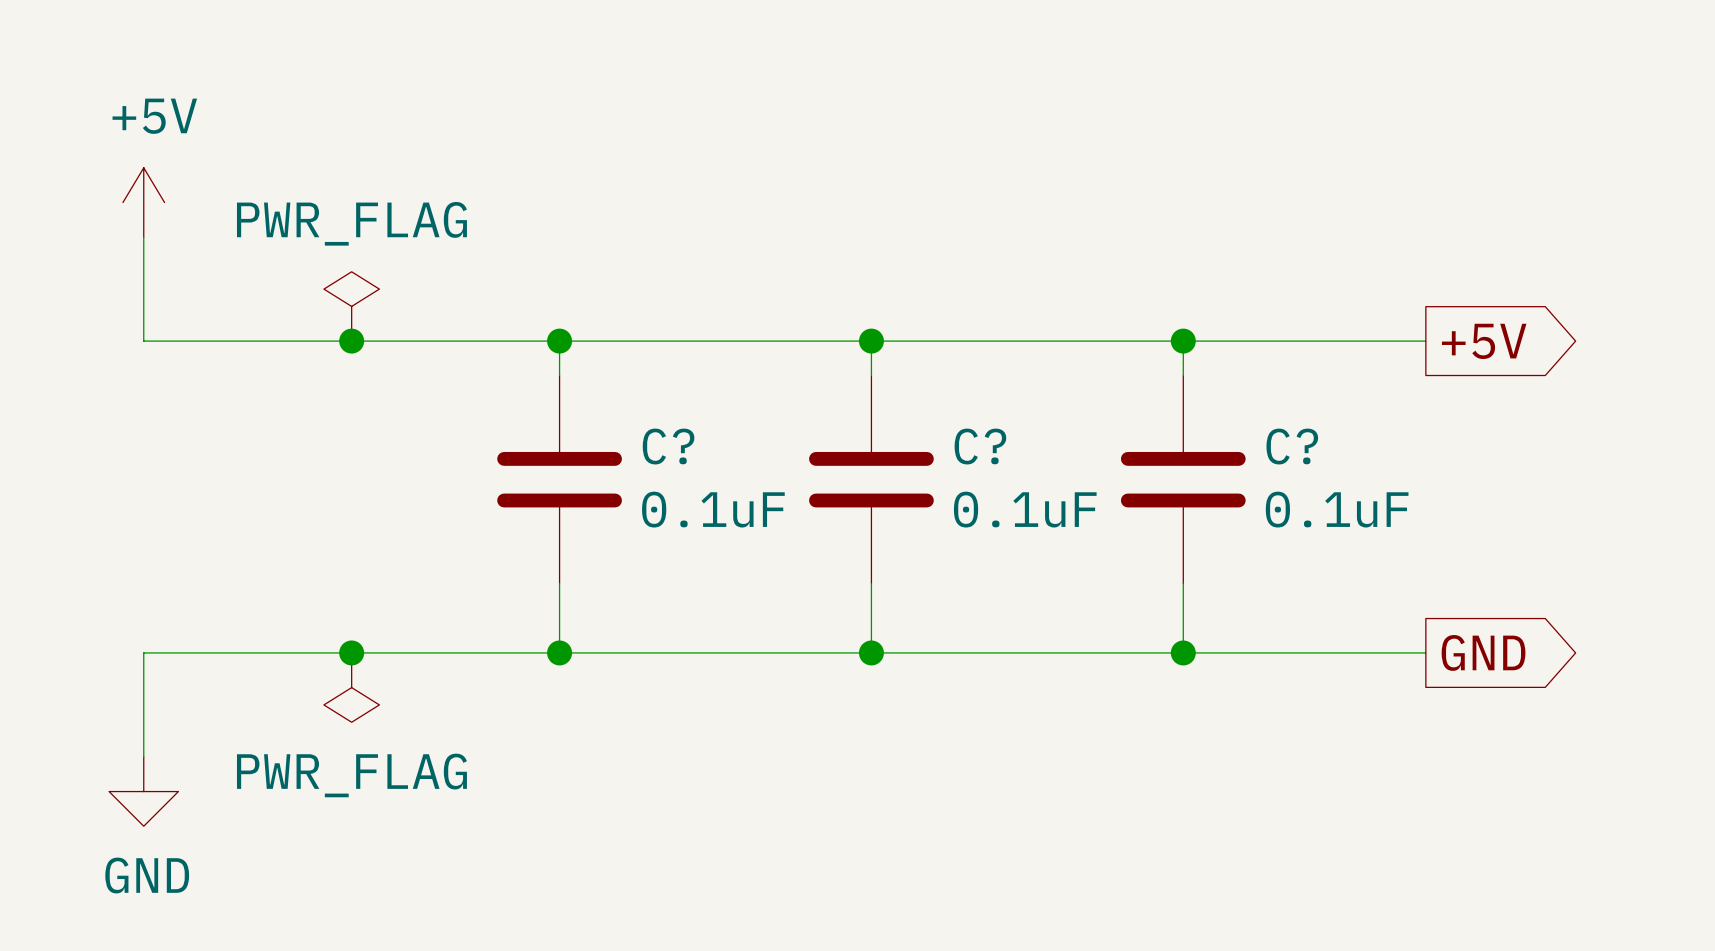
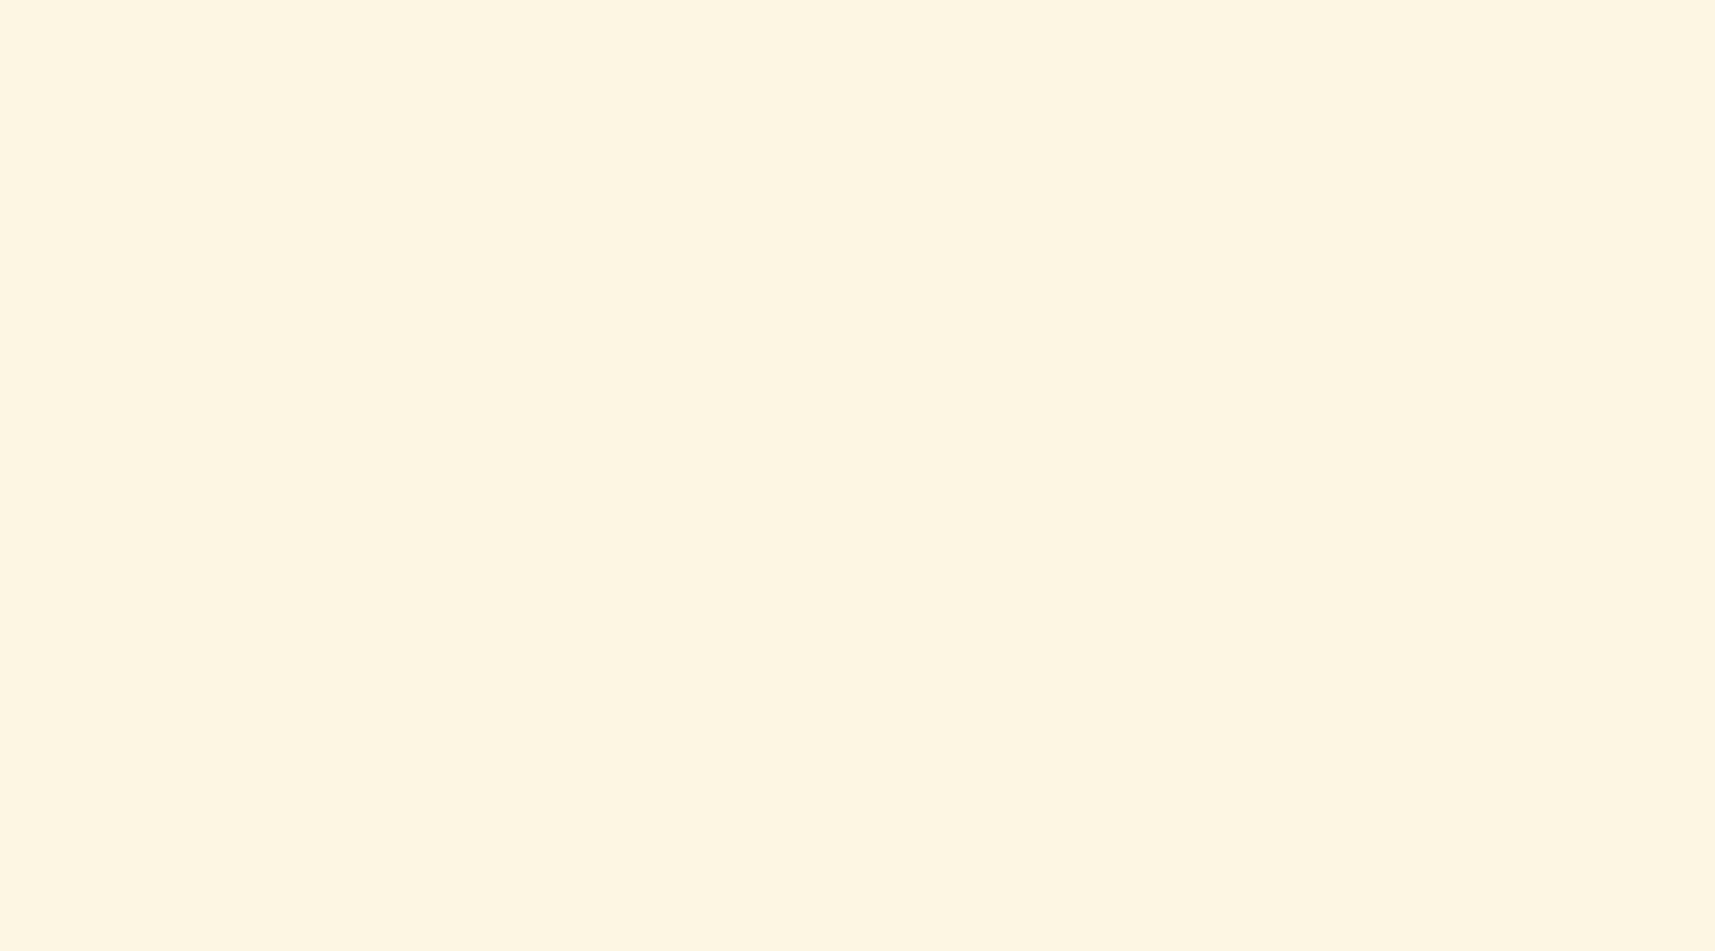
power symbol: +5V (143, 202) -> none
wire: (143, 237) (143, 341) (1425, 341) -> none
power symbol: PWR_FLAG (351, 306) -> none
junction: (351, 341) -> none
wire: (559, 341) (559, 375) -> none
junction: (559, 341) -> none
wire: (871, 341) (871, 375) -> none
junction: (871, 341) -> none
wire: (1183, 341) (1183, 375) -> none
junction: (1183, 341) -> none
global label: +5V (1484, 341) -> none
C?: 0.1uF (559, 479) -> none
C?: 0.1uF (871, 479) -> none
C?: 0.1uF (1183, 479) -> none
wire: (559, 583) (559, 652) -> none
wire: (871, 583) (871, 652) -> none
wire: (1183, 583) (1183, 652) -> none
junction: (351, 652) -> none
junction: (559, 652) -> none
junction: (871, 652) -> none
junction: (1183, 652) -> none
wire: (1425, 652) (143, 652) (143, 756) -> none
global label: GND (1483, 652) -> none
power symbol: PWR_FLAG (351, 687) -> none
power symbol: GND (143, 791) -> none

